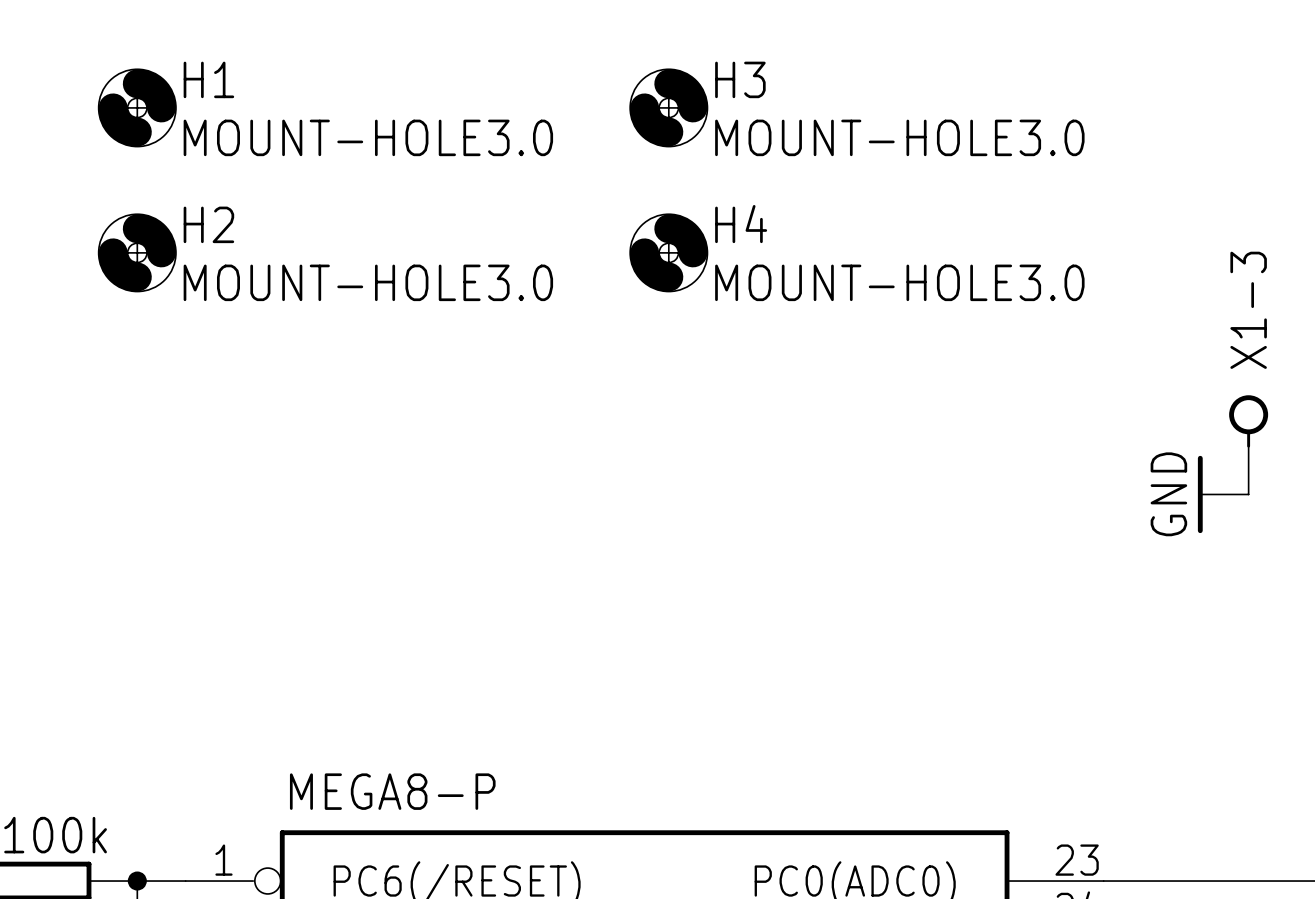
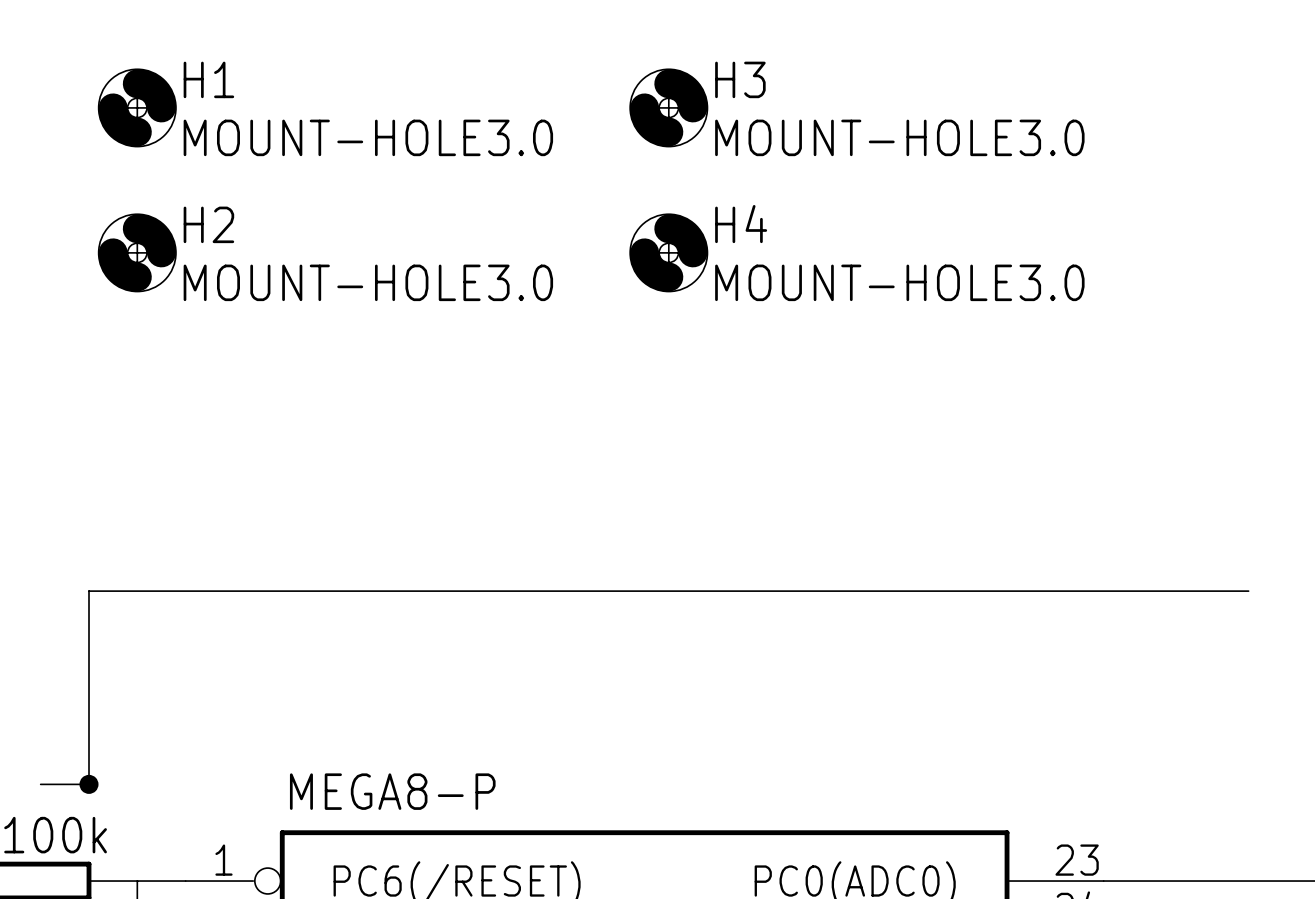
X1-3: (1248, 444) -> none
power symbol: GND (1223, 494) -> none
wire: none -> (1248, 591) (89, 591) (89, 784) (40, 784)
junction: none -> (89, 784)
junction: (137, 881) -> none

